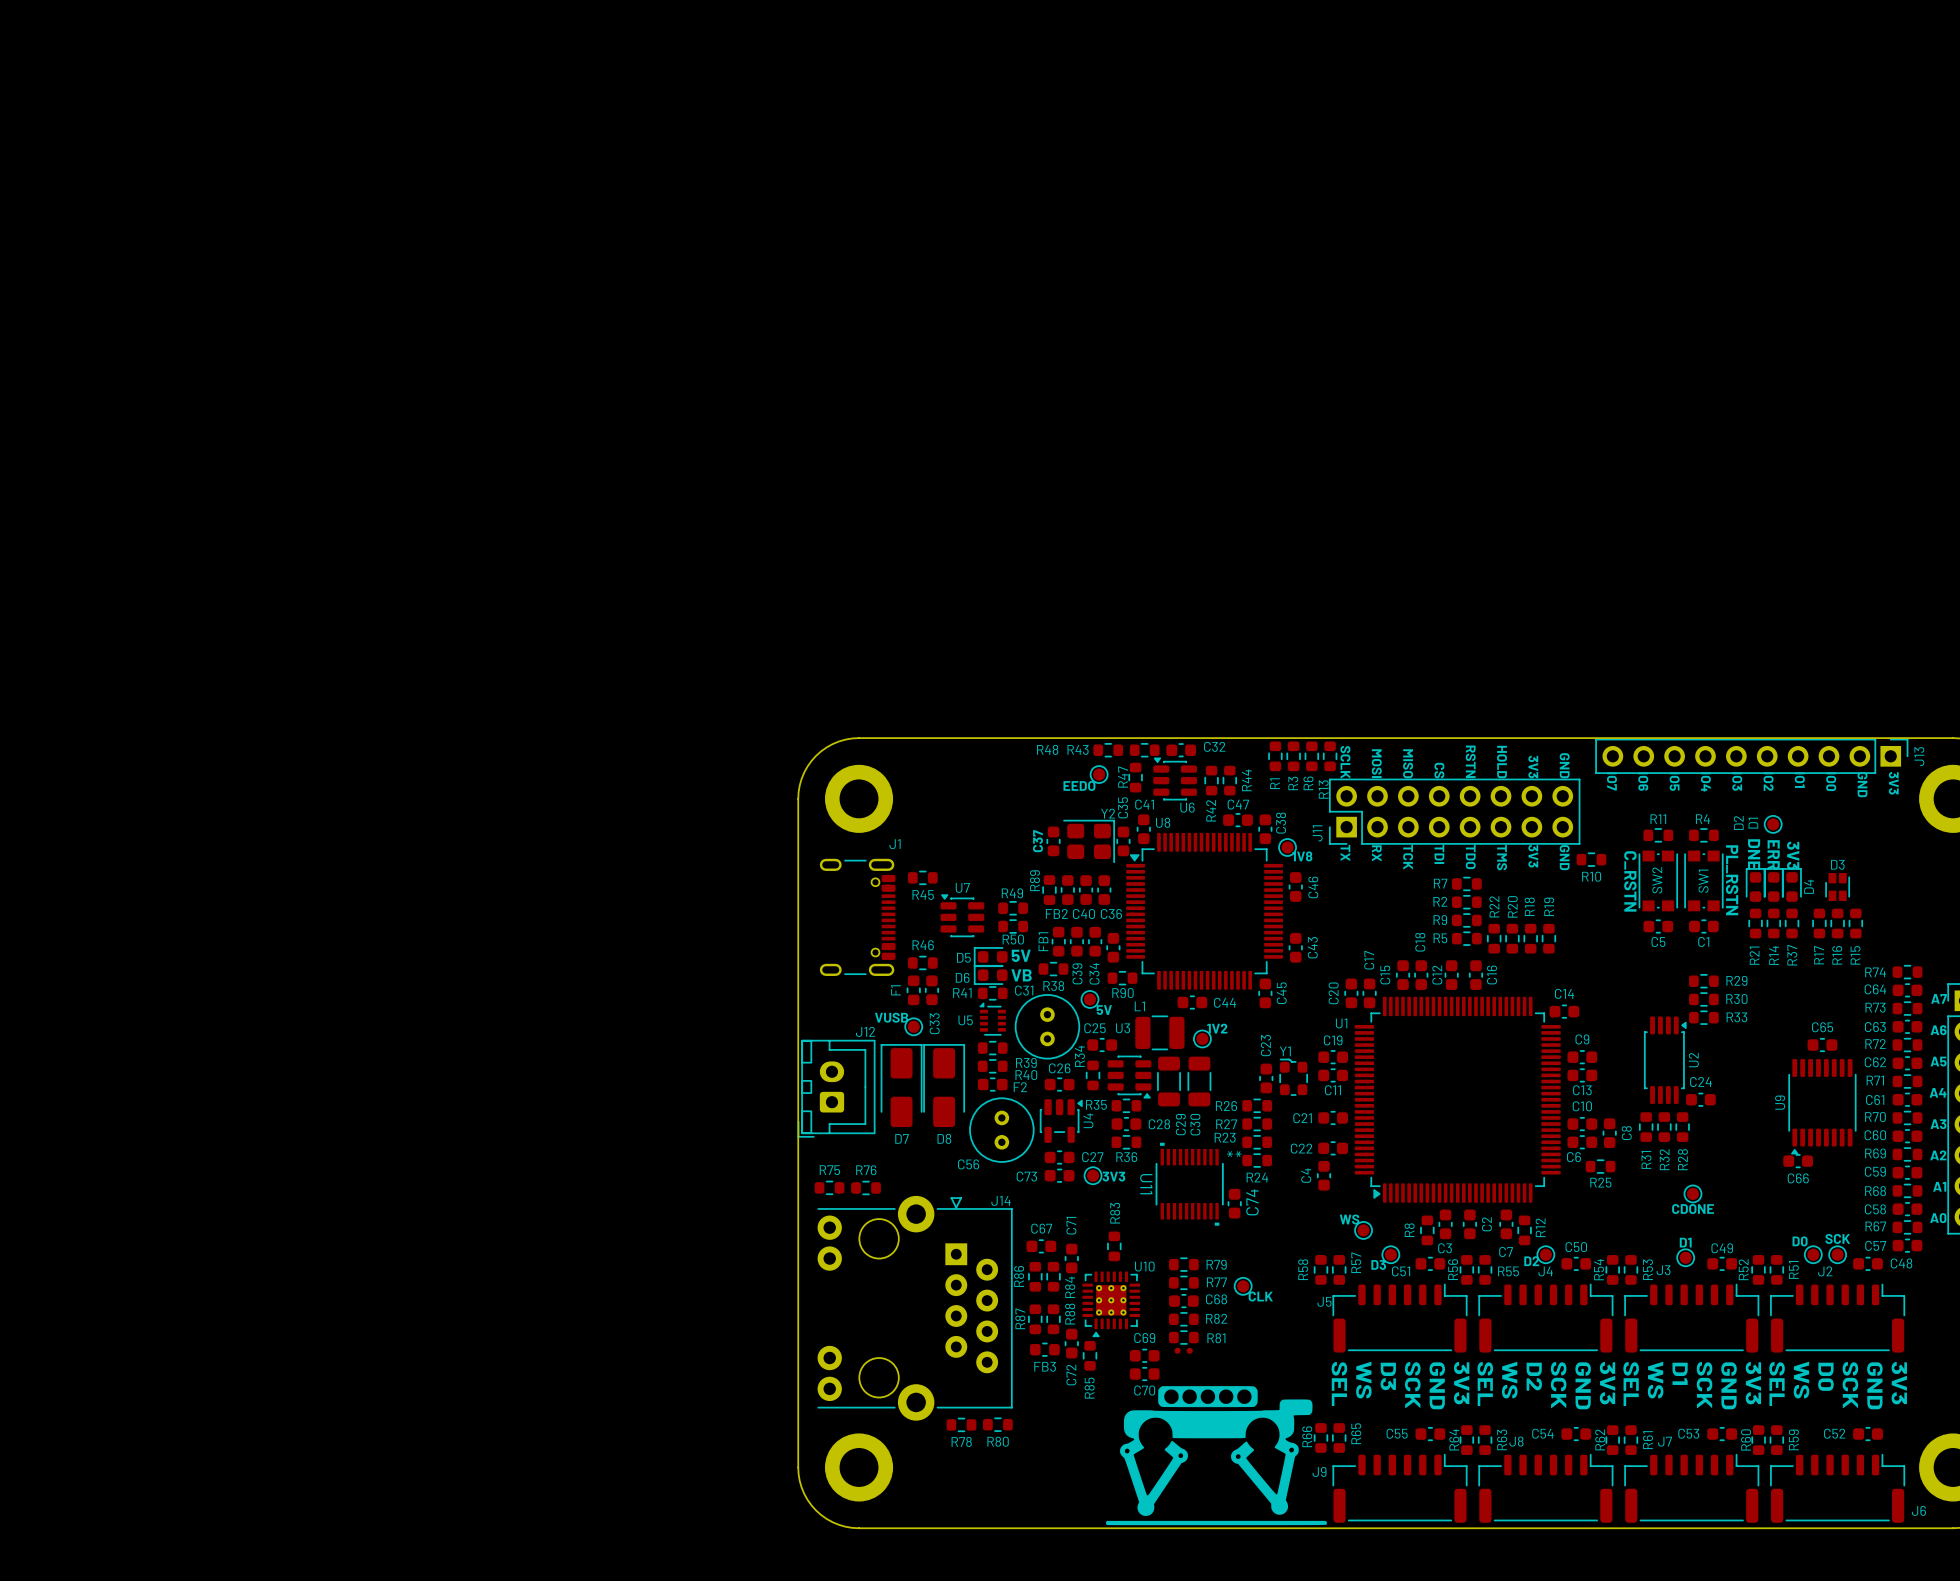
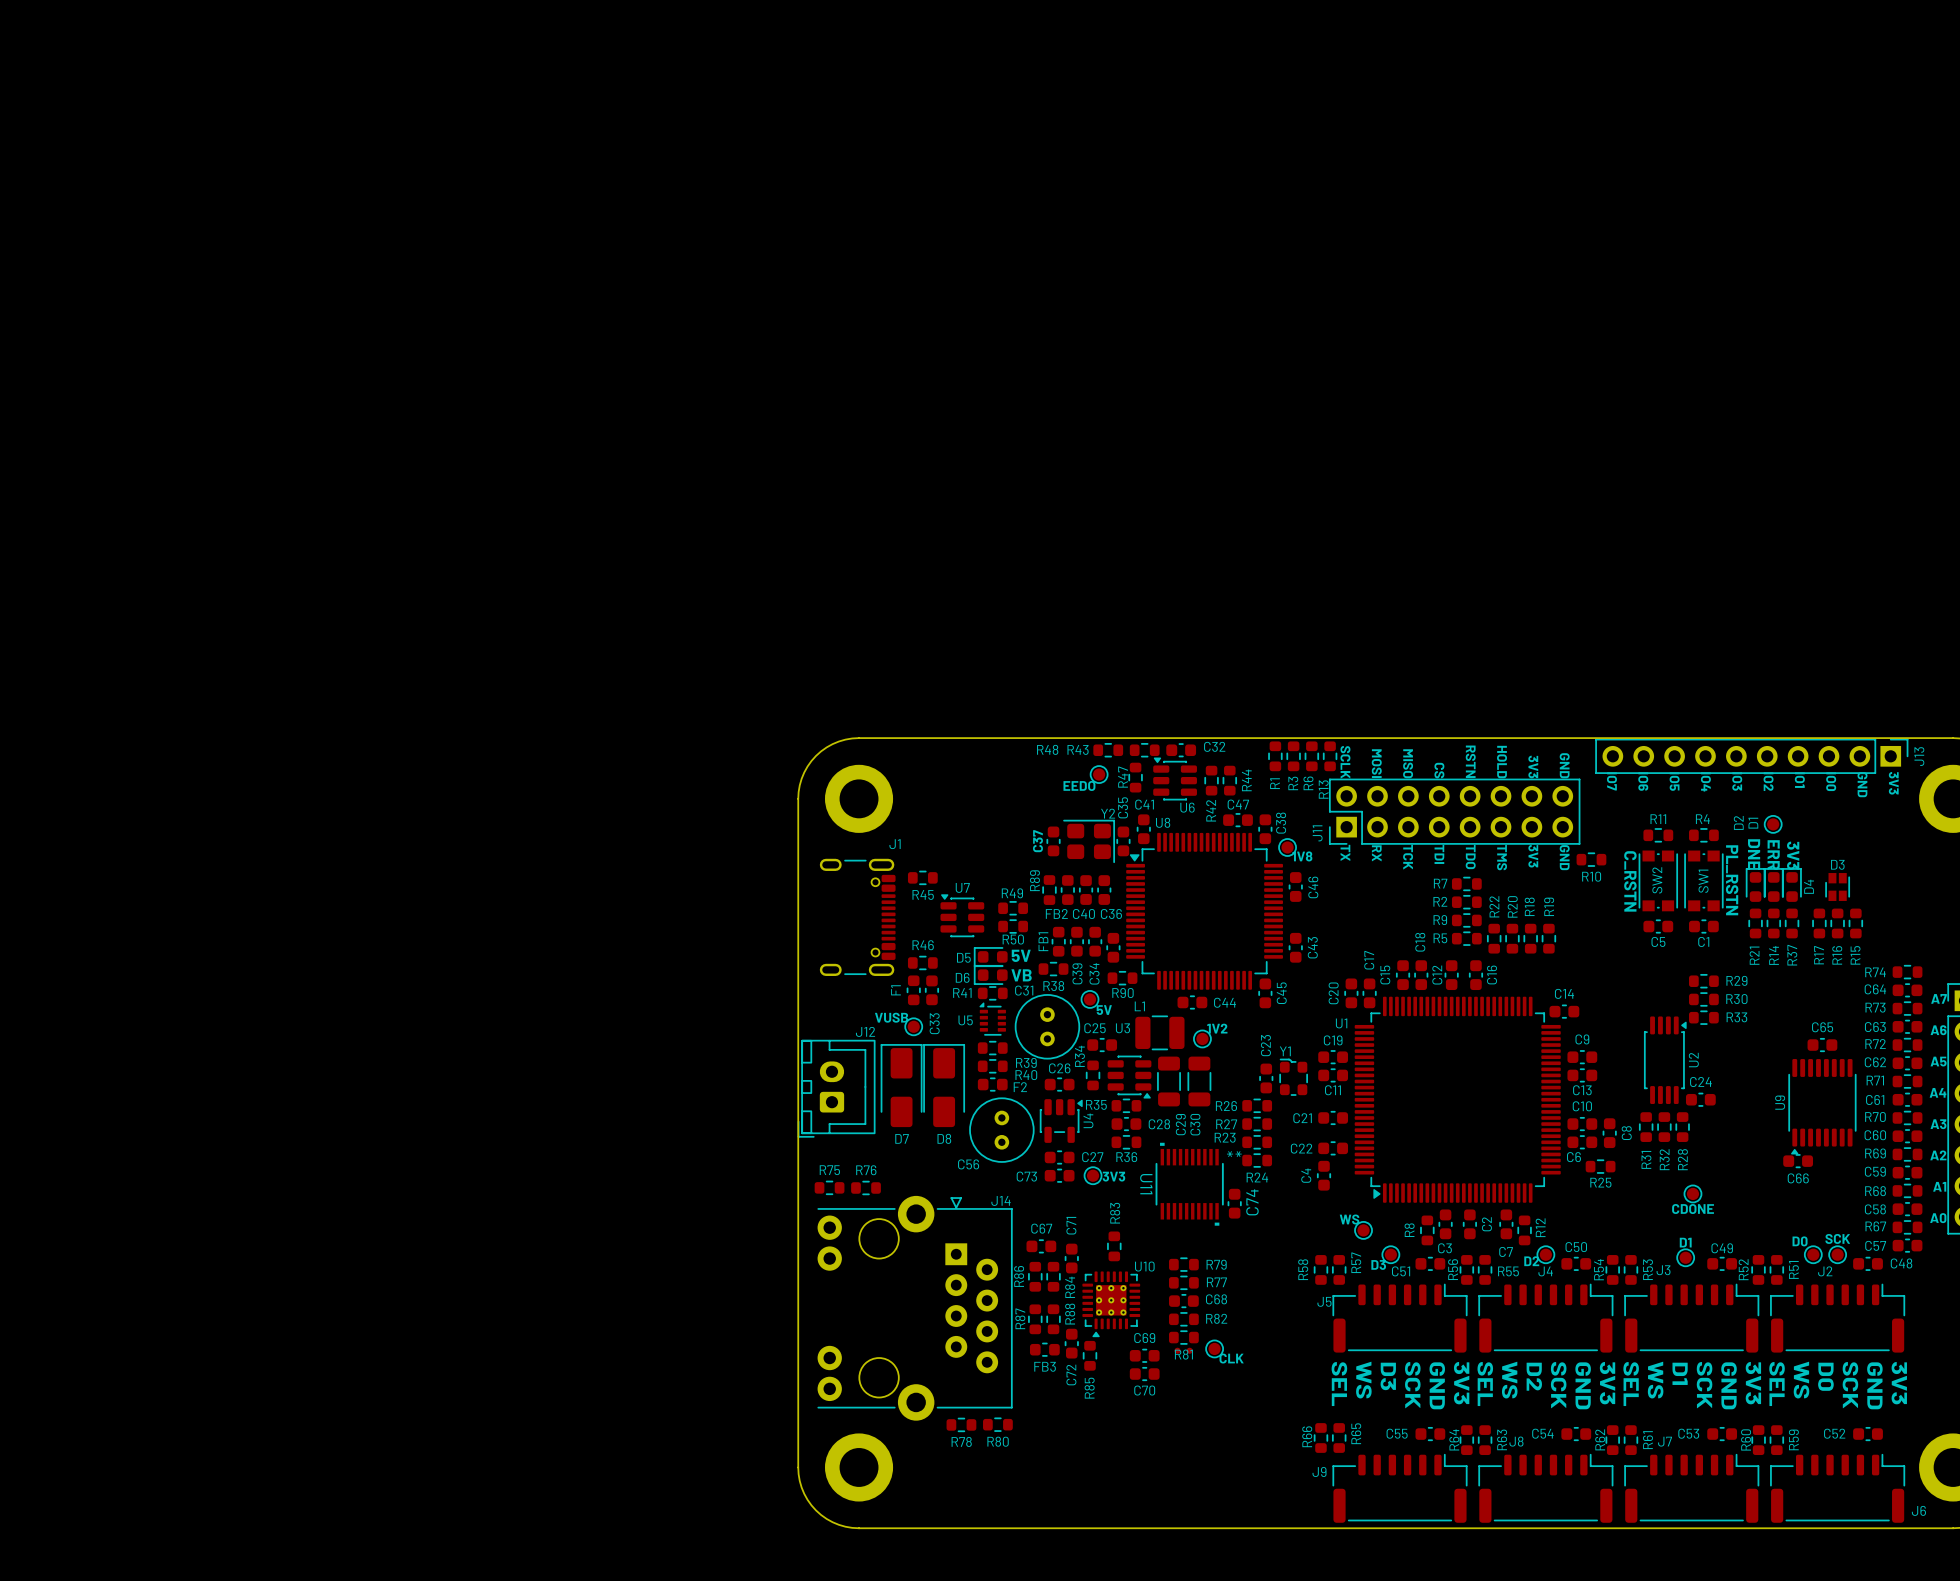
part position: (1243, 1286) -> (1214, 1348)
text position: CLK (1260, 1296) -> CLK (1231, 1358)
R81 name position: R81 (1216, 1338) -> R81 (1183, 1354)
drawing: [1105, 1386, 1327, 1526] -> none

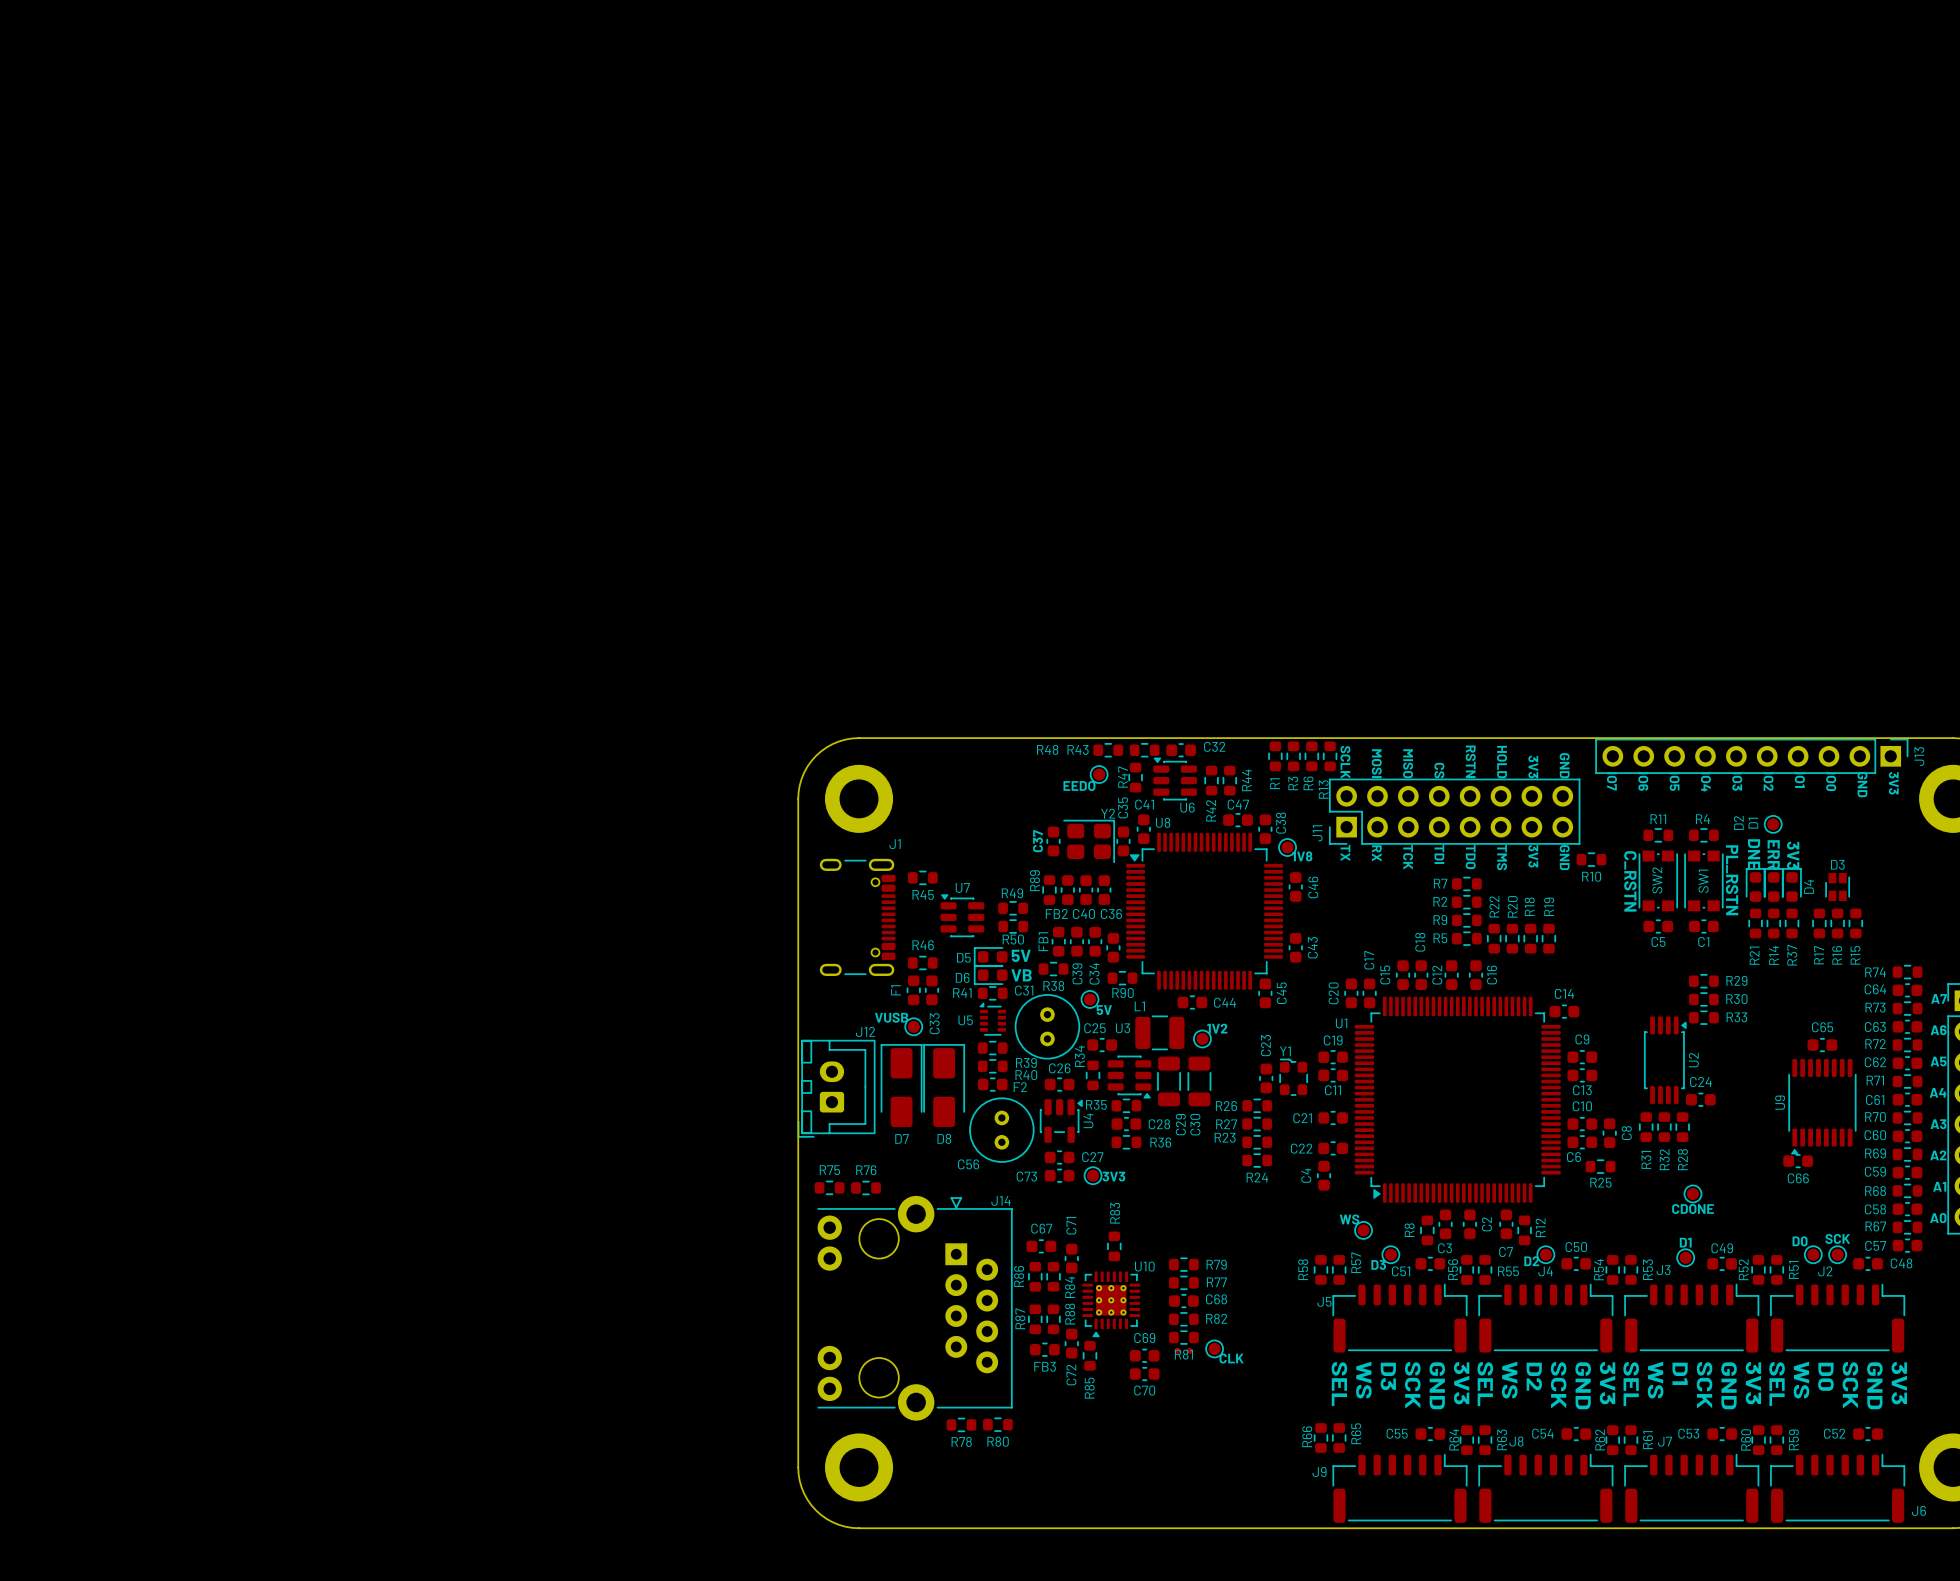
R36 name position: R36 (1126, 1157) -> R36 (1160, 1142)
U11: (1189, 1184) -> none
C74: (1234, 1203) -> none

